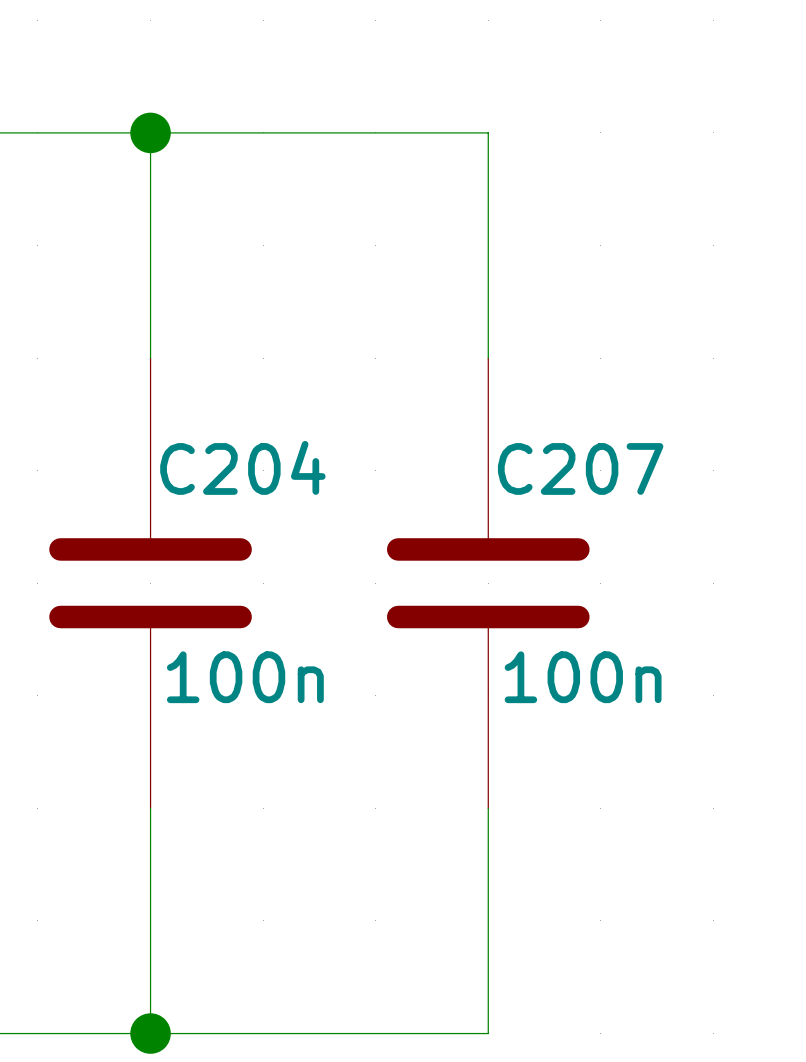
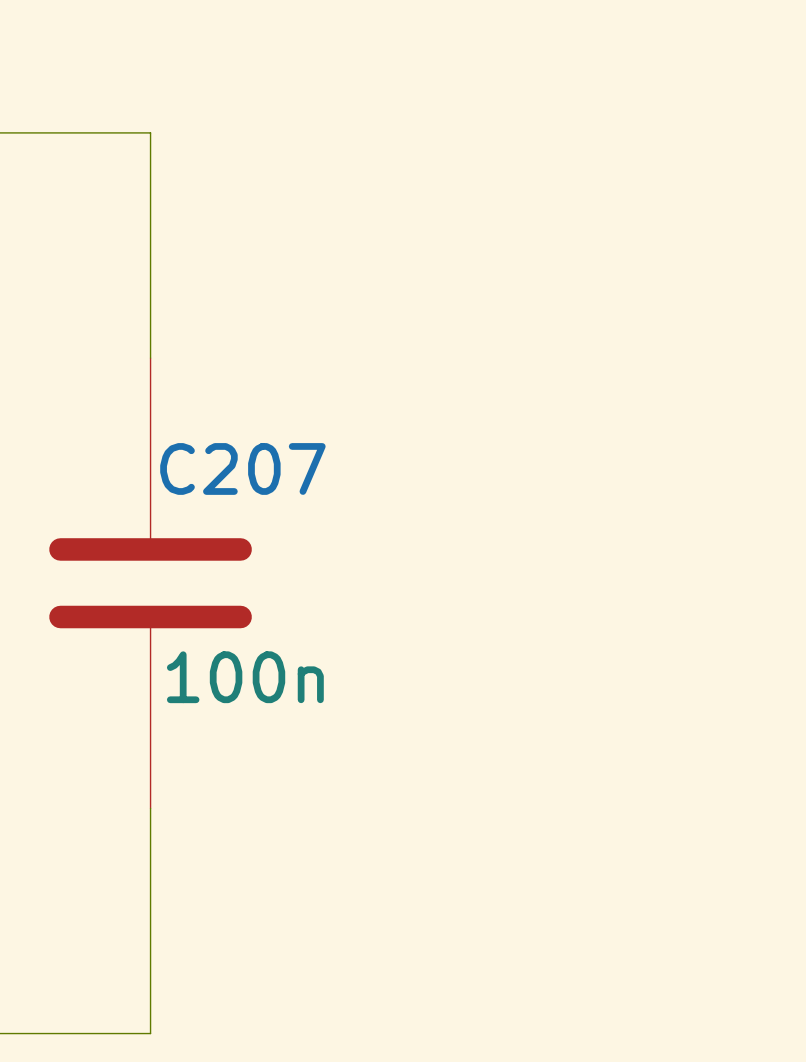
wire: (150, 132) (488, 132) (488, 358) -> none
junction: (150, 132) -> none
C204 name: C204 (242, 467) -> C207 (242, 468)
C207: 100n (488, 583) -> none
wire: (488, 808) (488, 1033) (150, 1033) -> none
junction: (150, 1033) -> none

